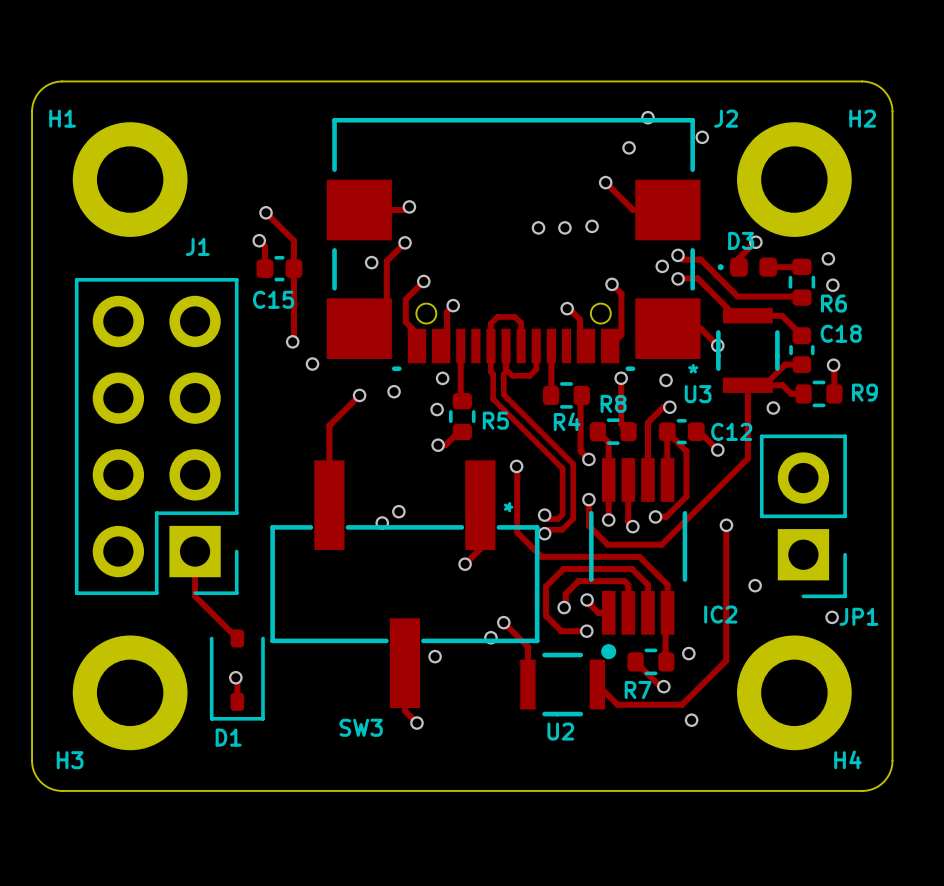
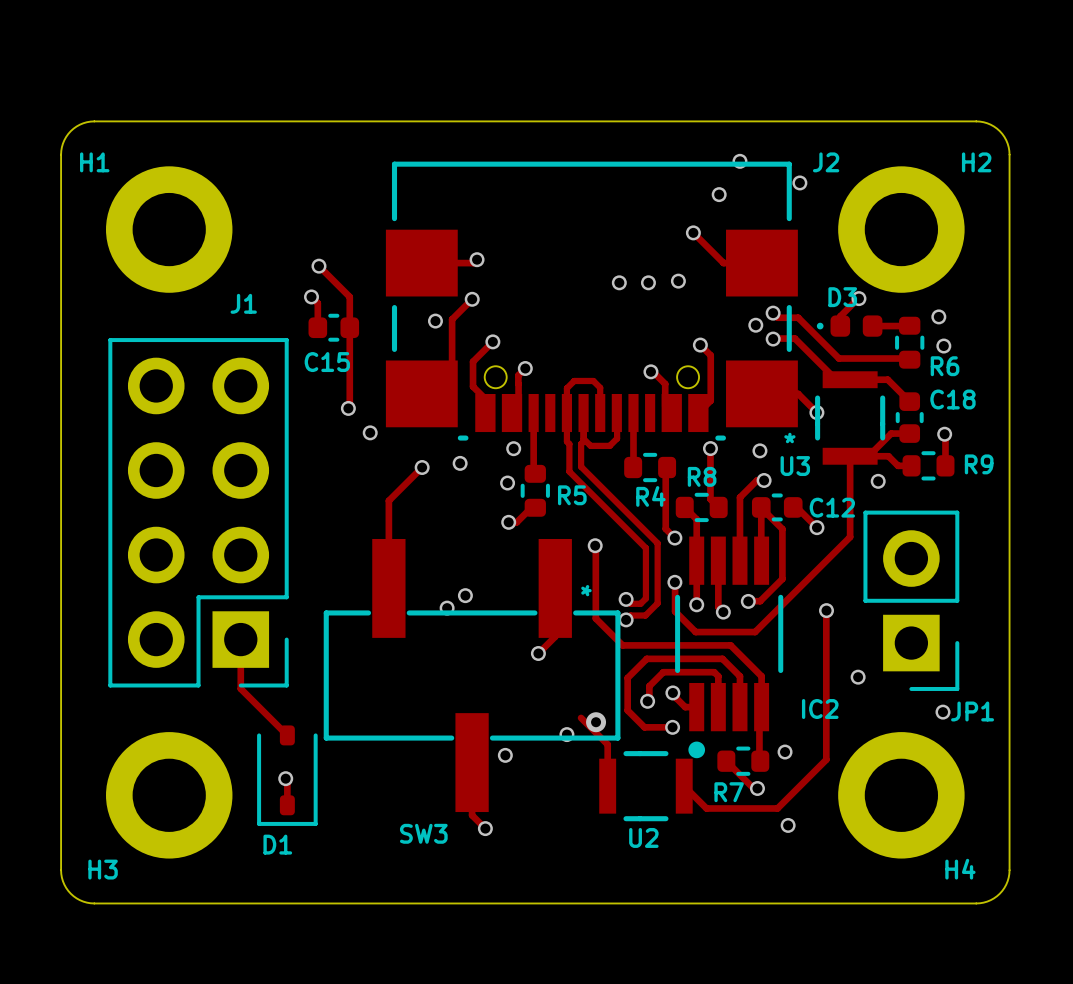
via position: (503, 622) -> (596, 722)

